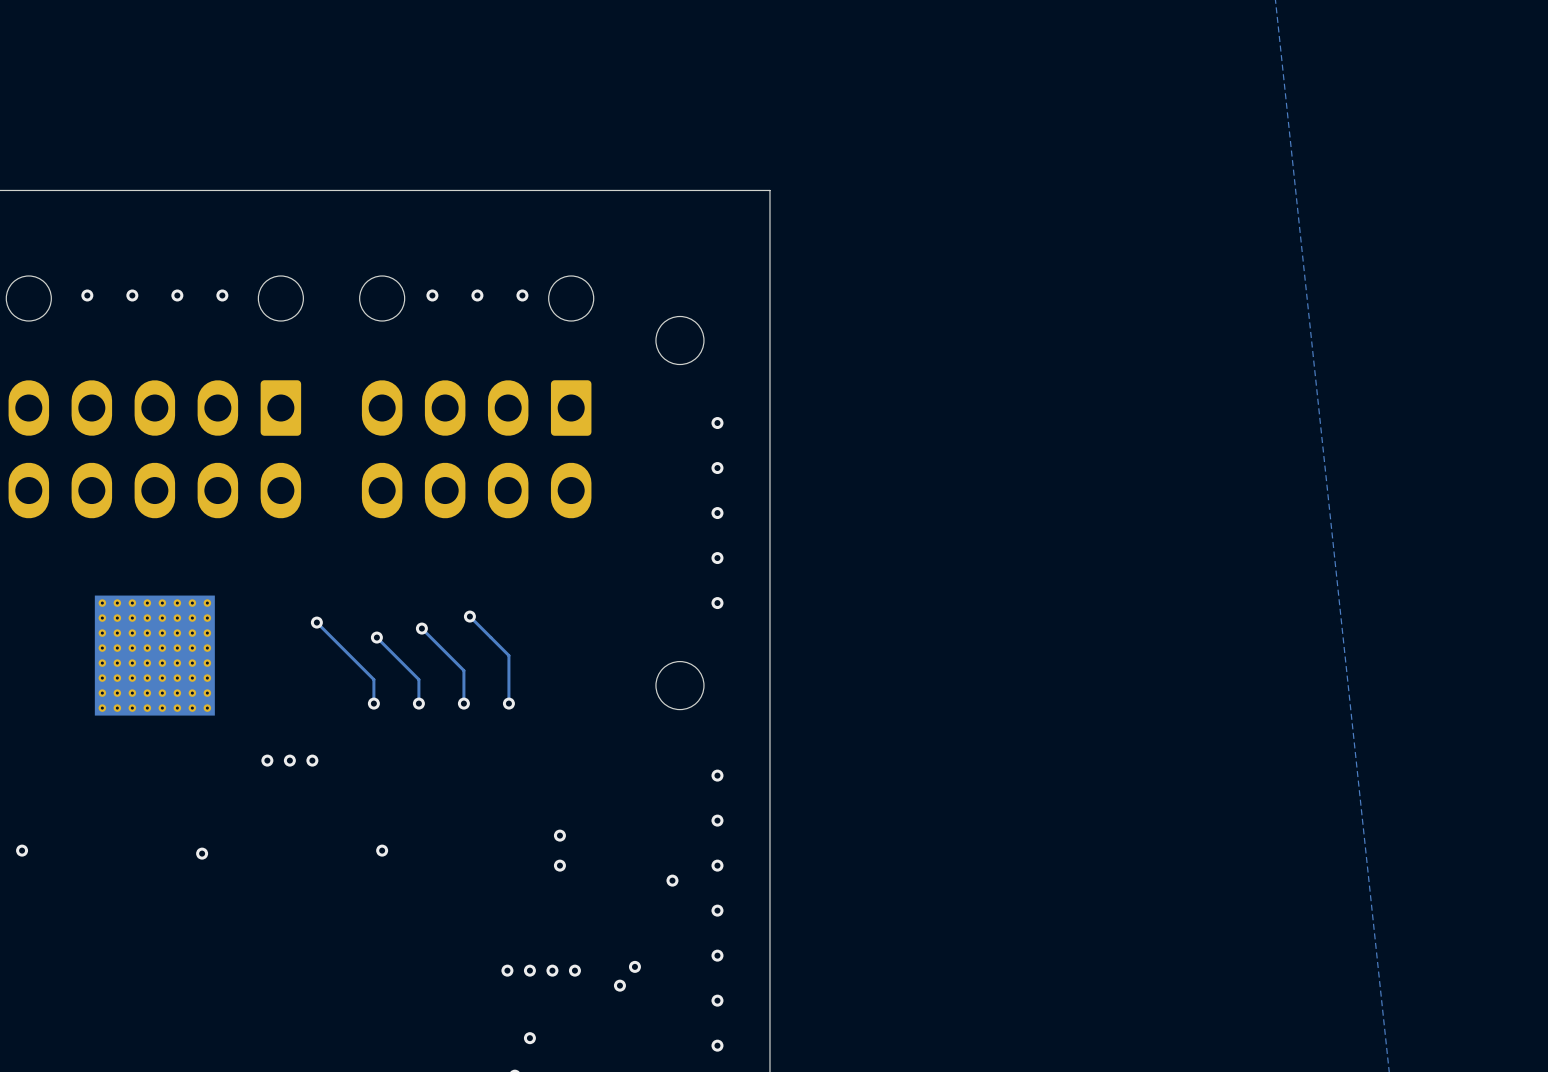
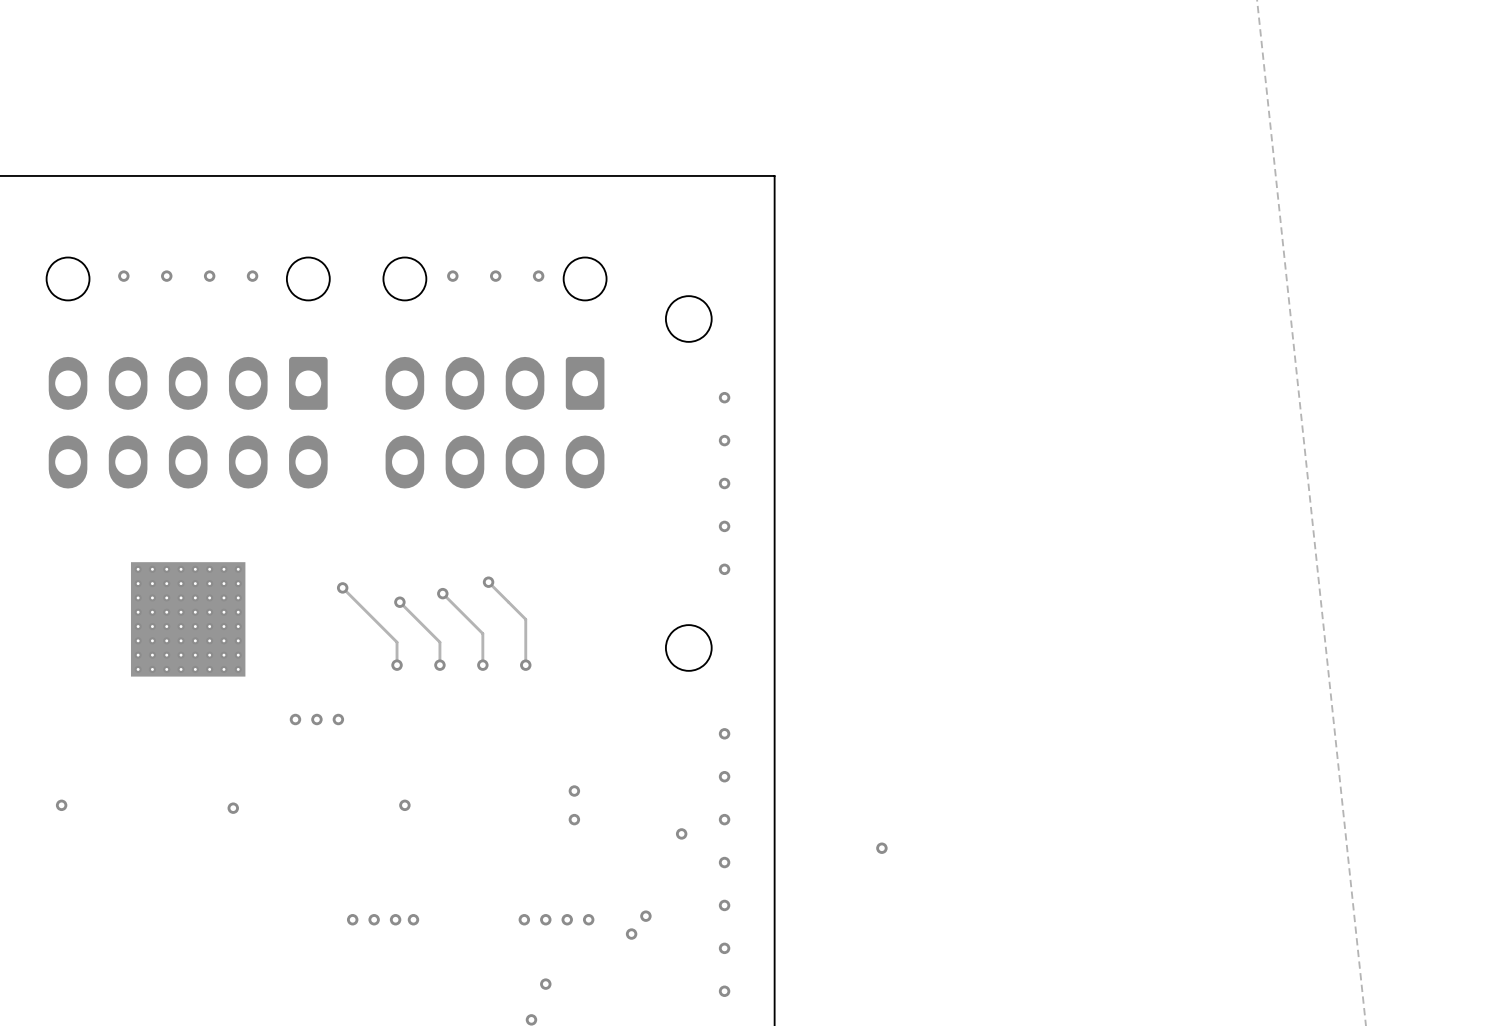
via: none -> (881, 848)
via: none -> (352, 919)
via: none -> (374, 919)
via: none -> (395, 919)
via: none -> (413, 919)

